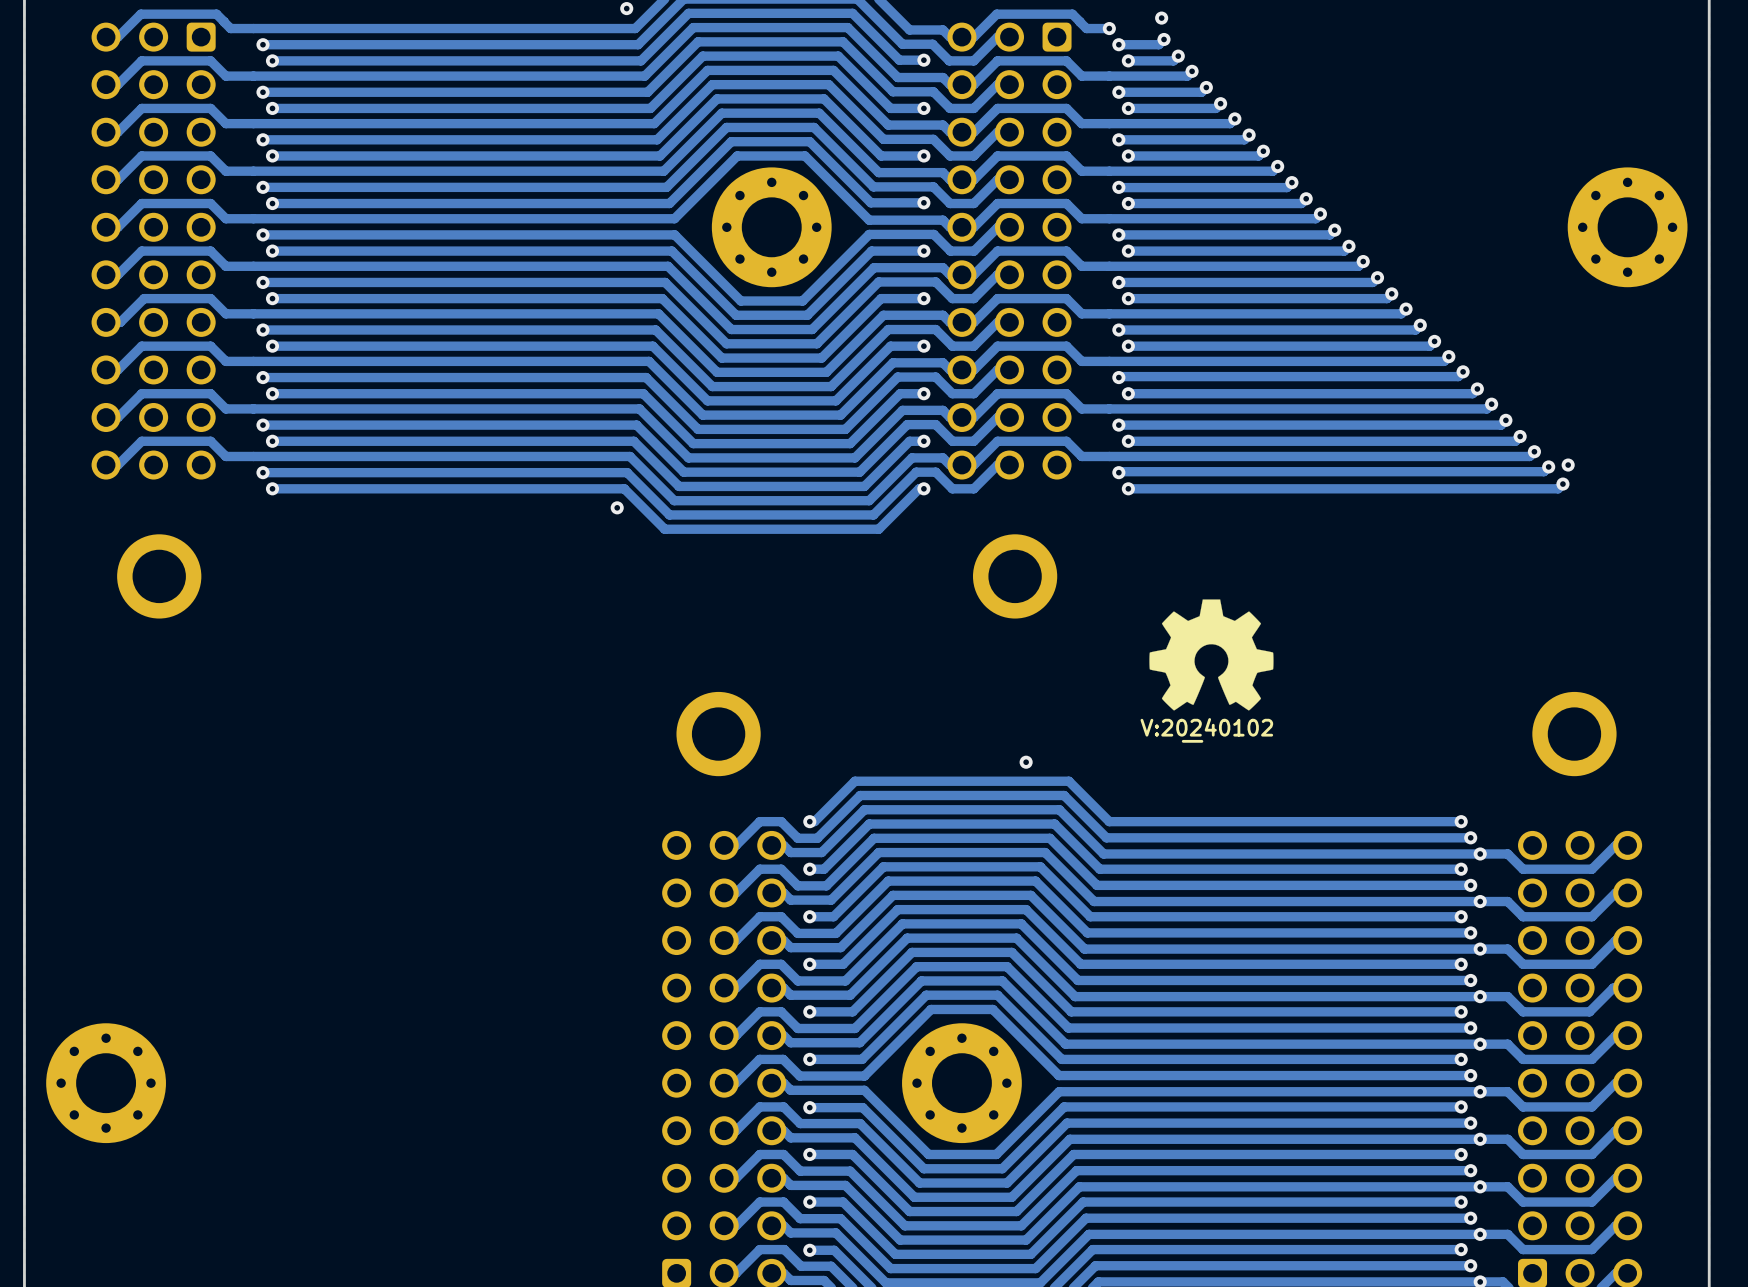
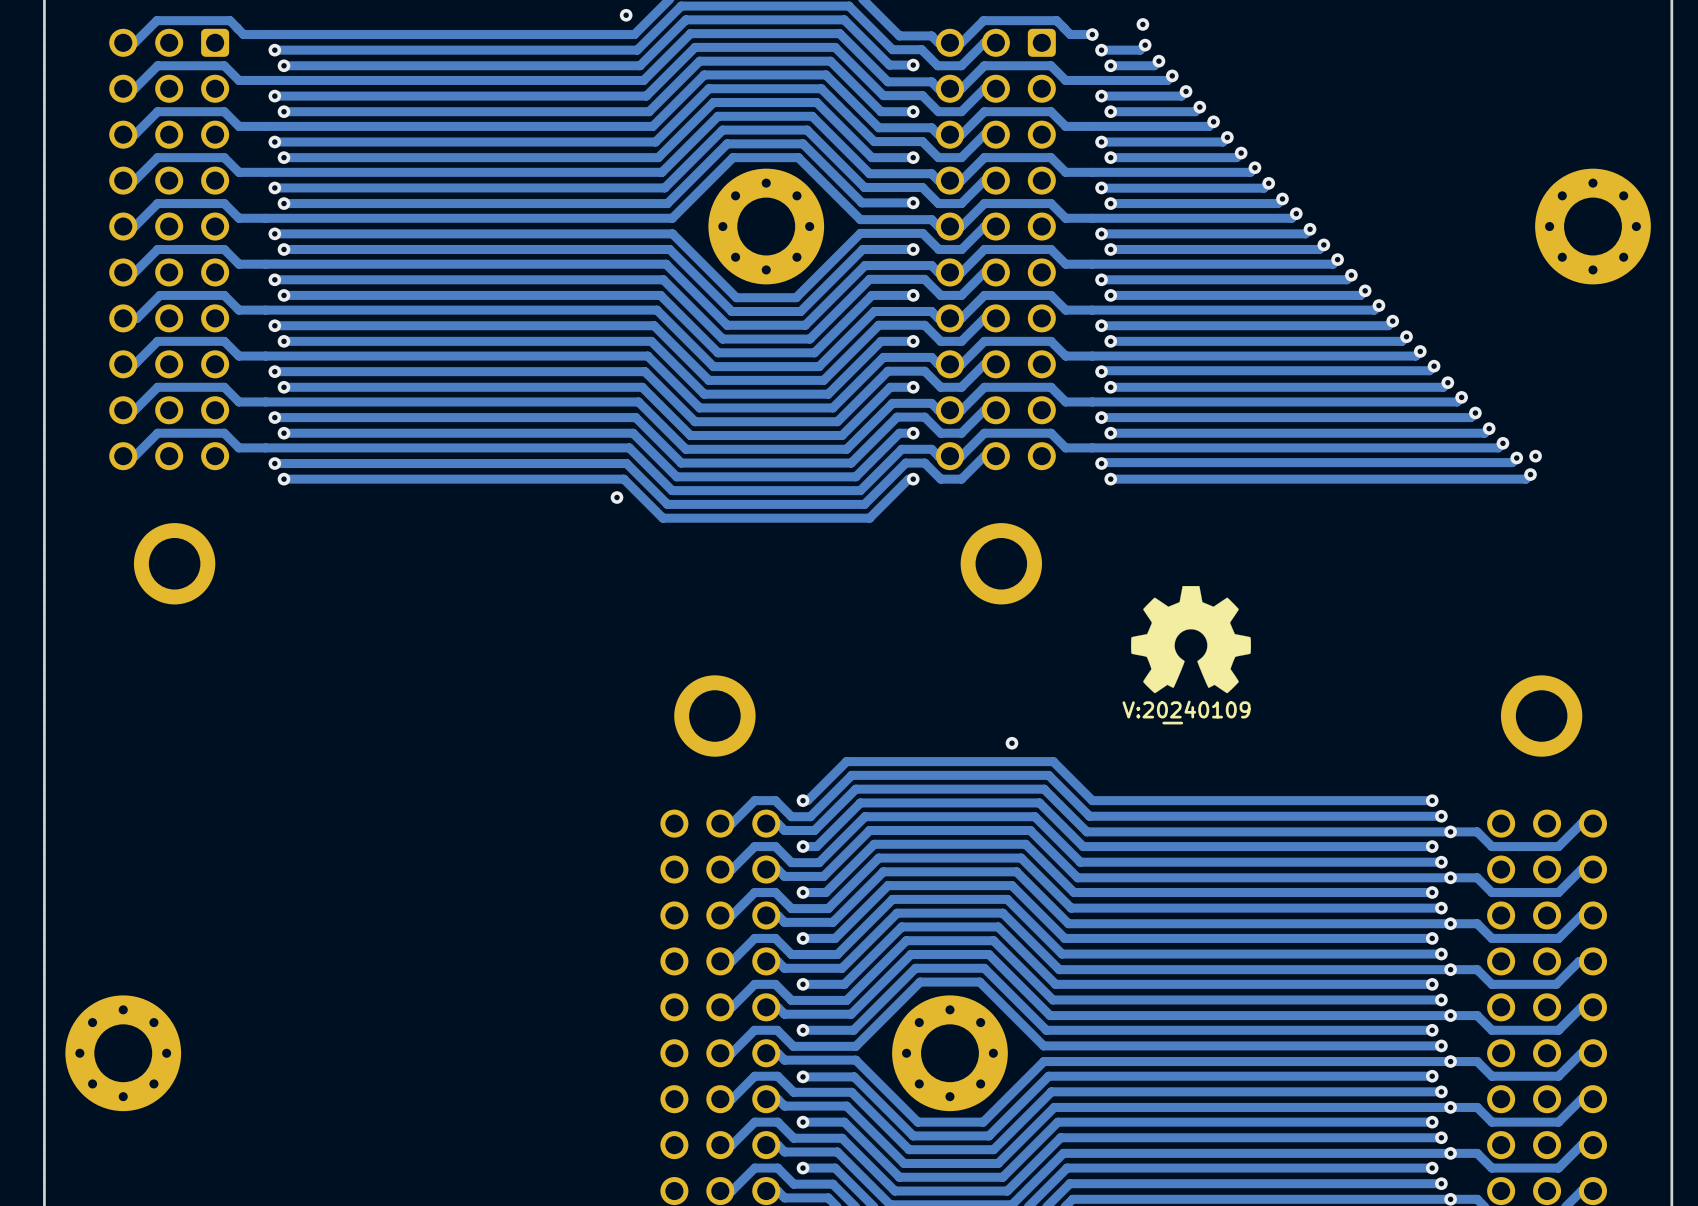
drawing shape: [1140, 718, 1274, 743] -> [1122, 700, 1251, 725]

